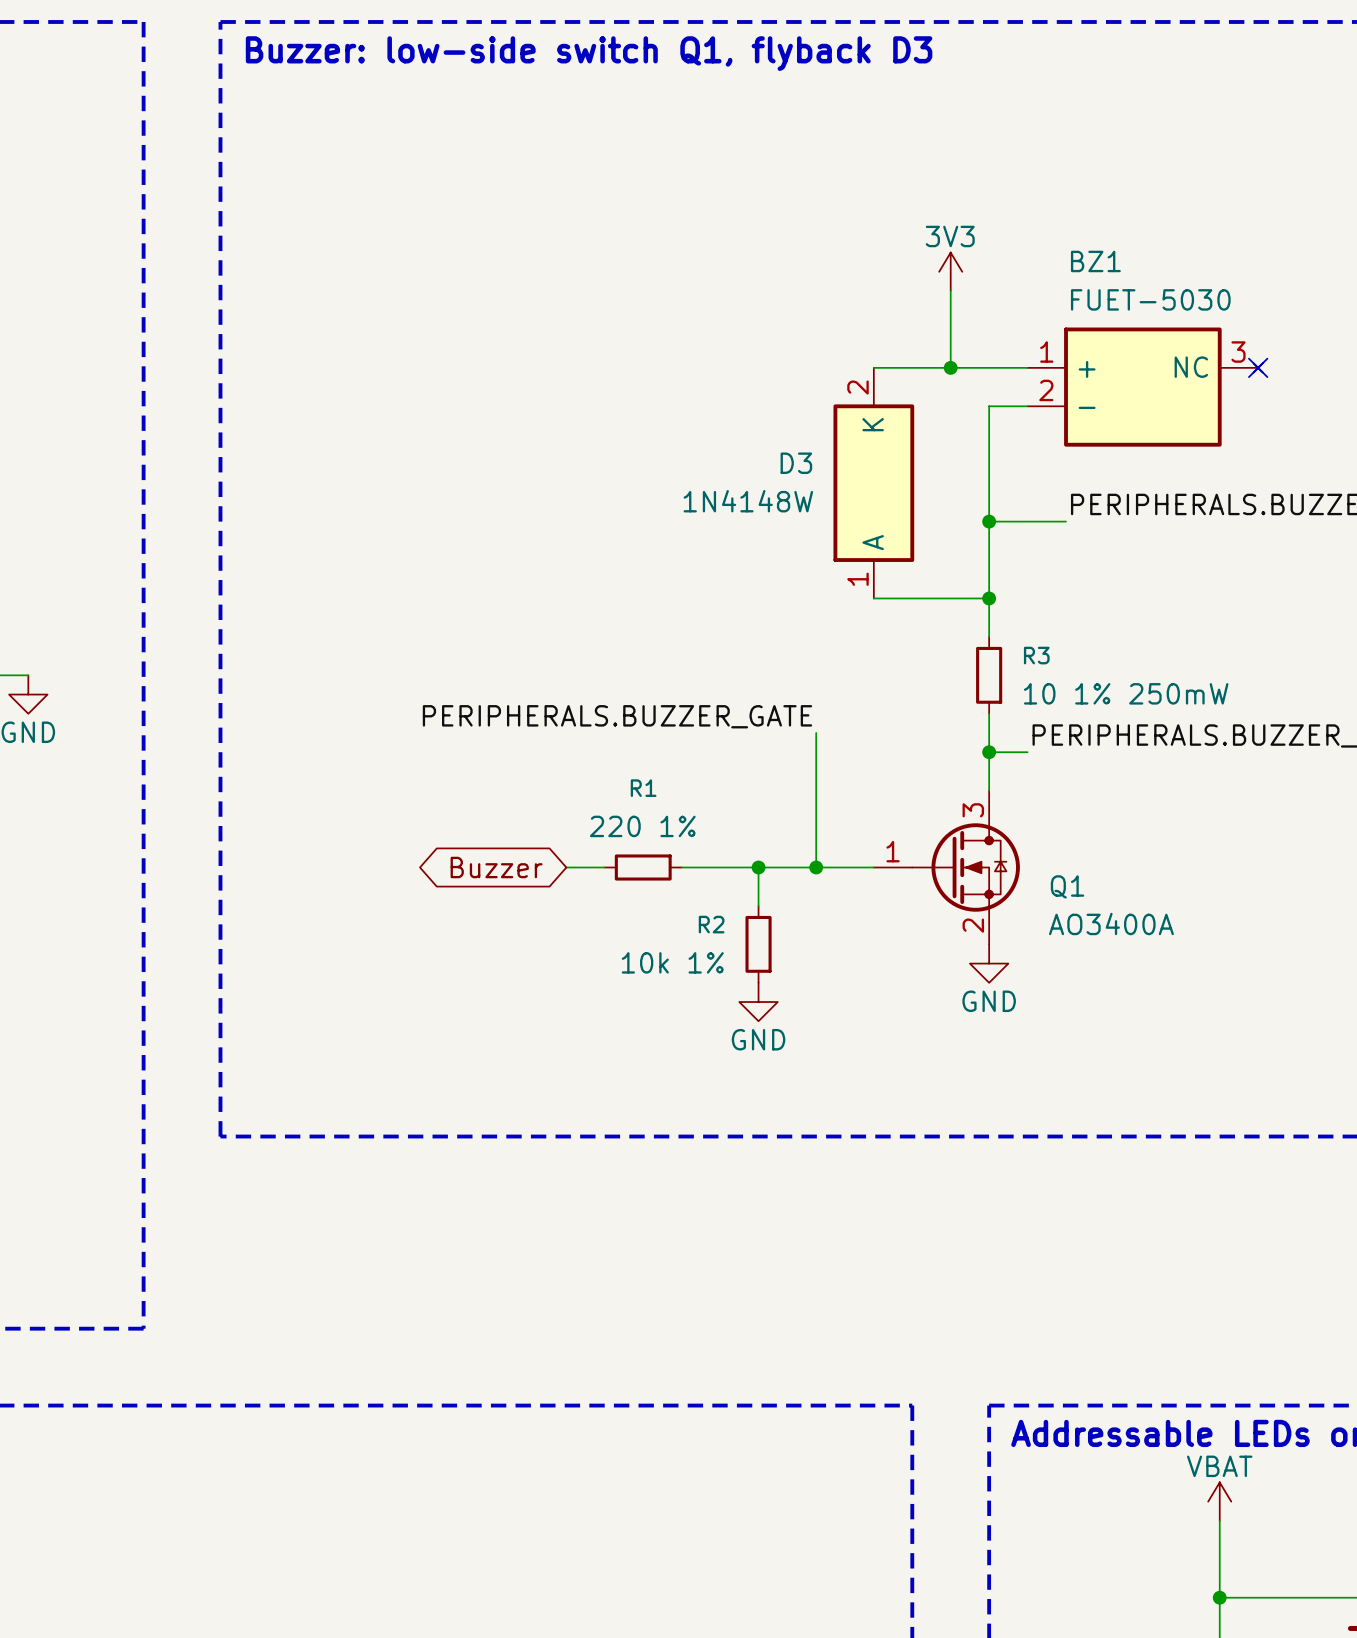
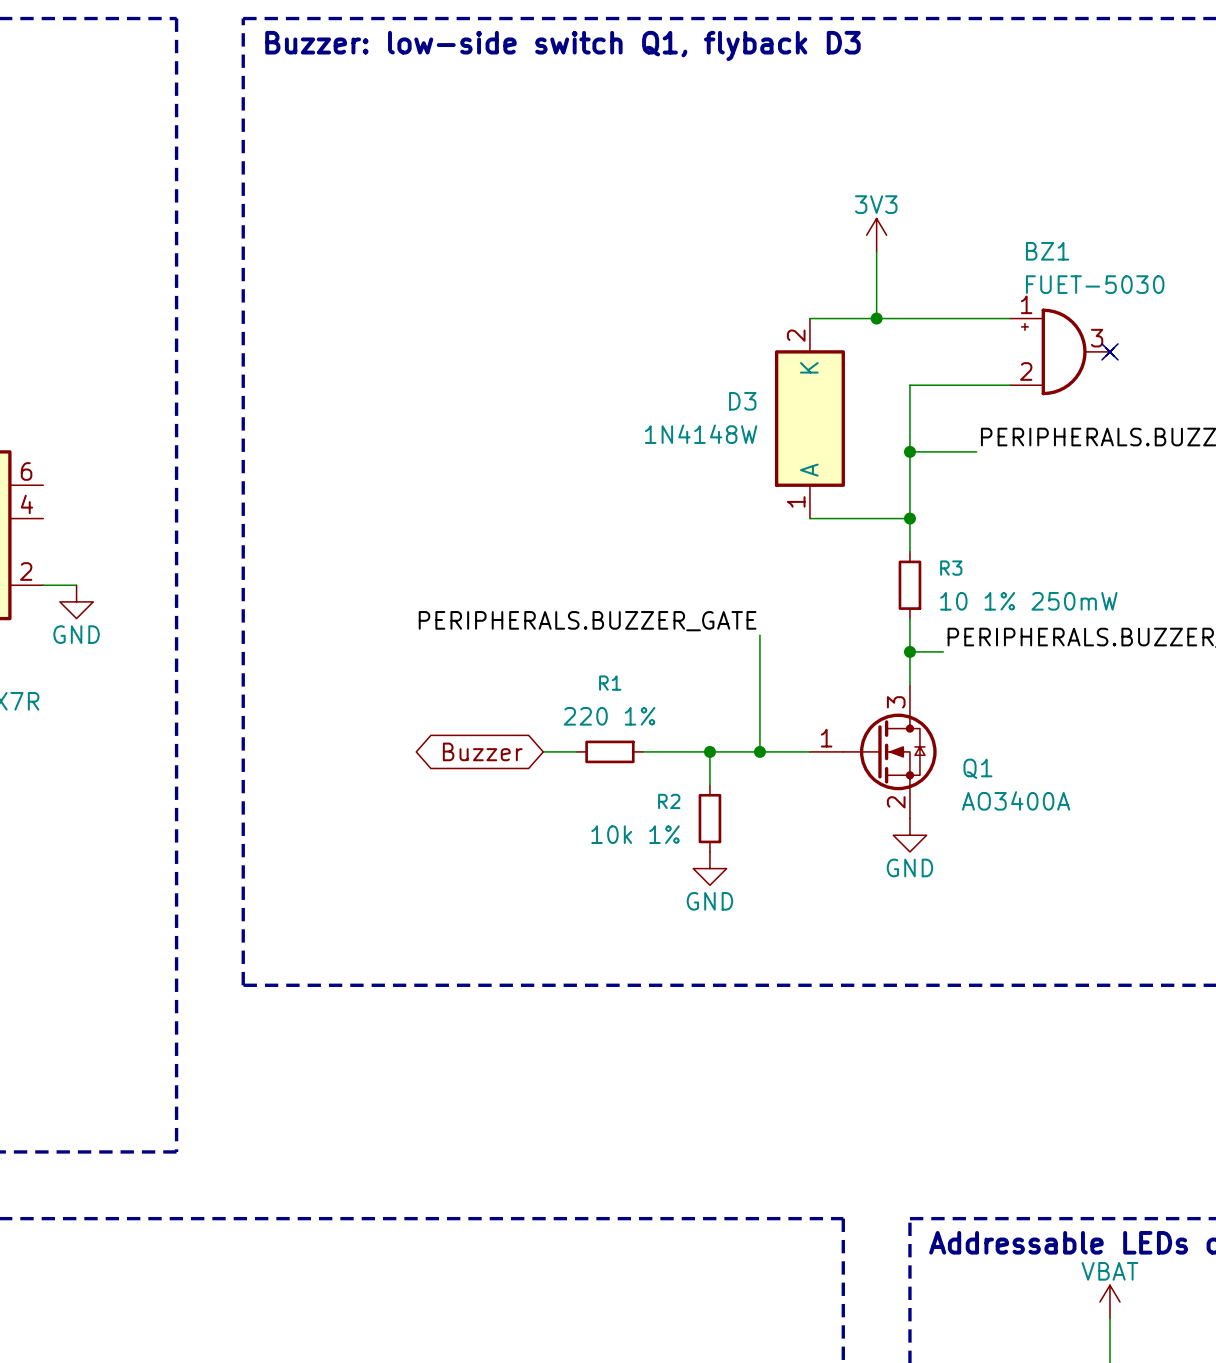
BZ1 name position: BZ1 (1095, 261) -> BZ1 (1047, 251)
BZ1 value position: FUET-5030 (1150, 299) -> FUET-5030 (1095, 284)
BZ1 symbol: [1027, 327, 1263, 447] -> [1009, 308, 1114, 396]
no-connect mark position: (1258, 367) -> (1109, 351)
wire: (1027, 406) (989, 406) (989, 444) -> (1009, 385) (909, 385)

